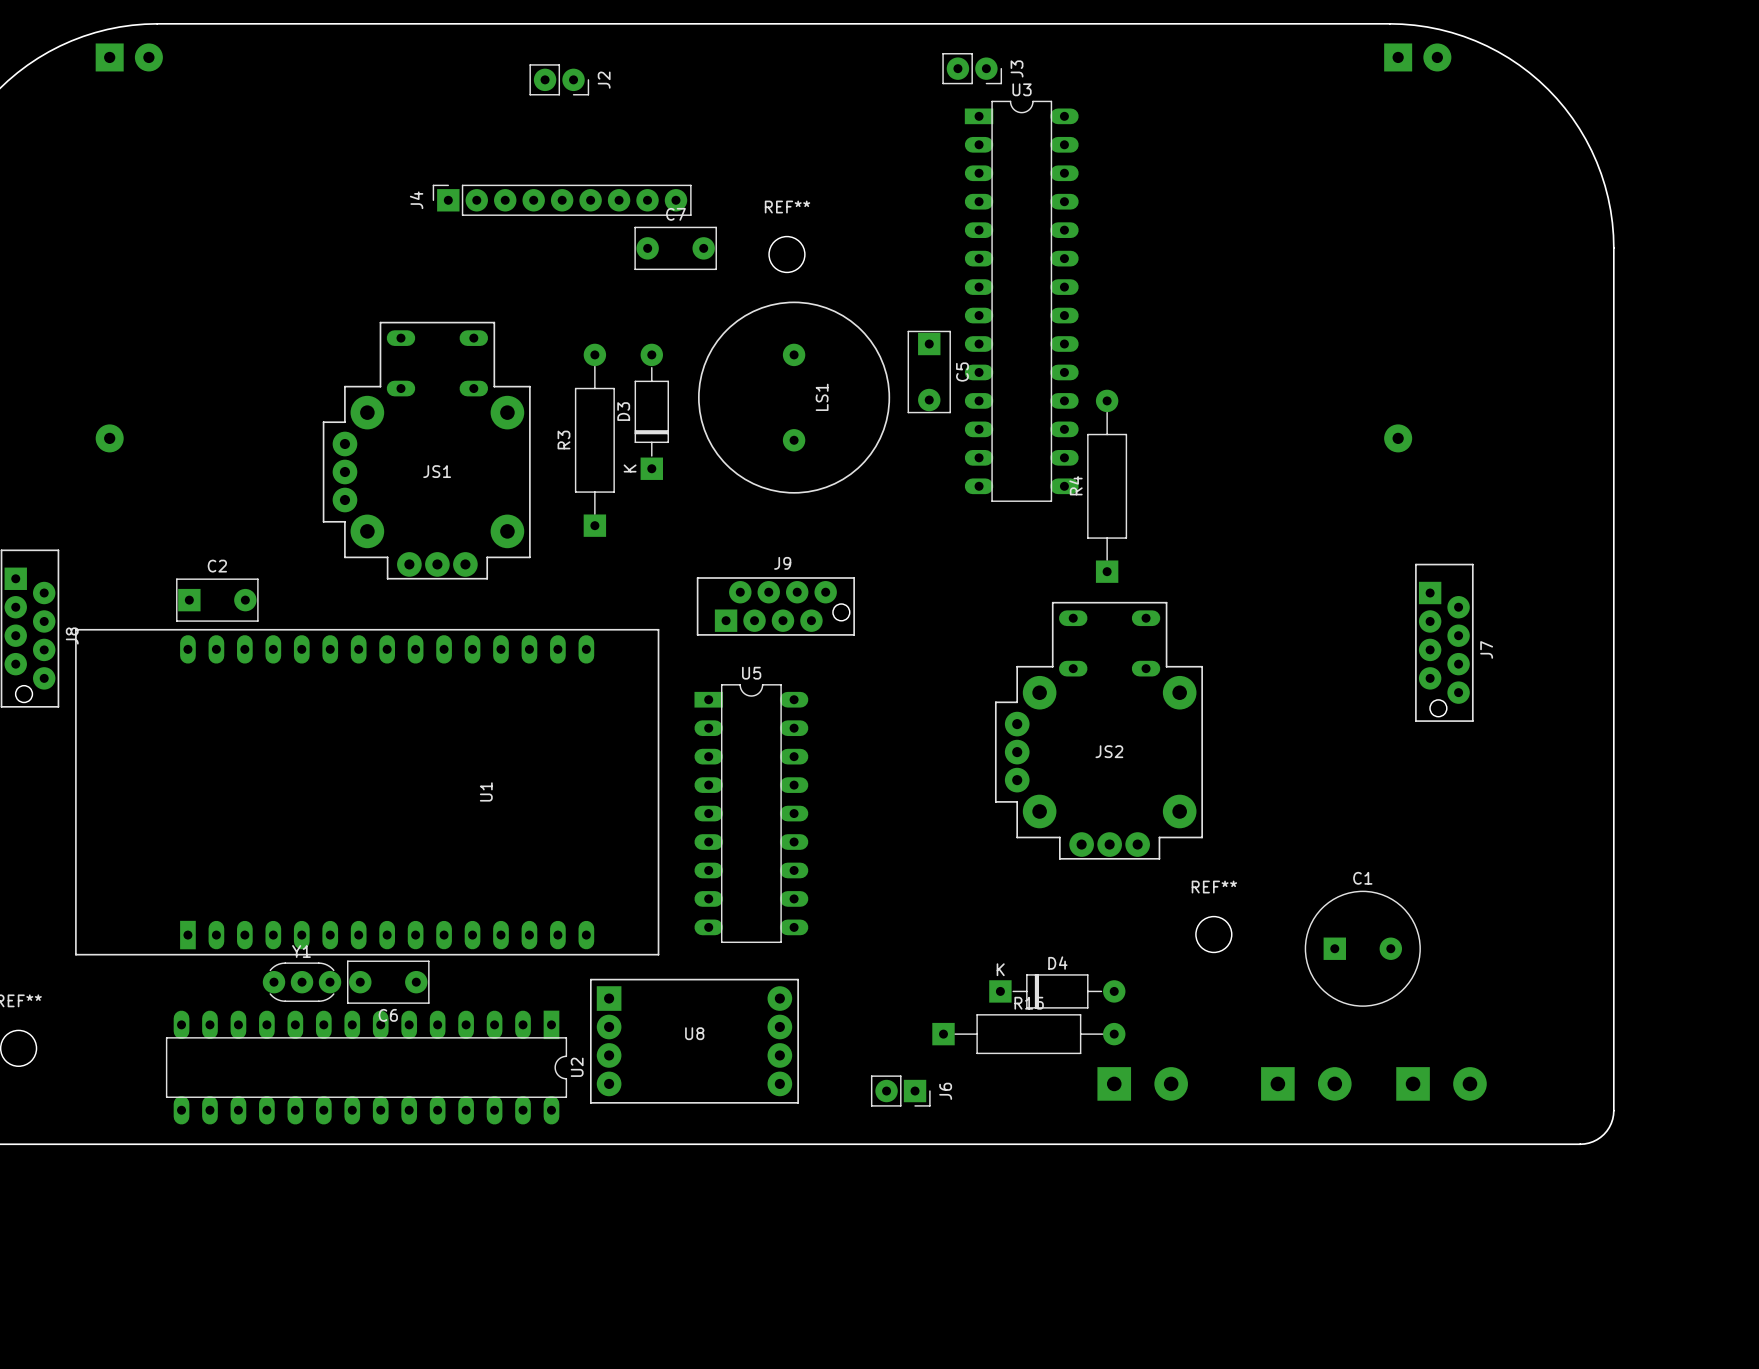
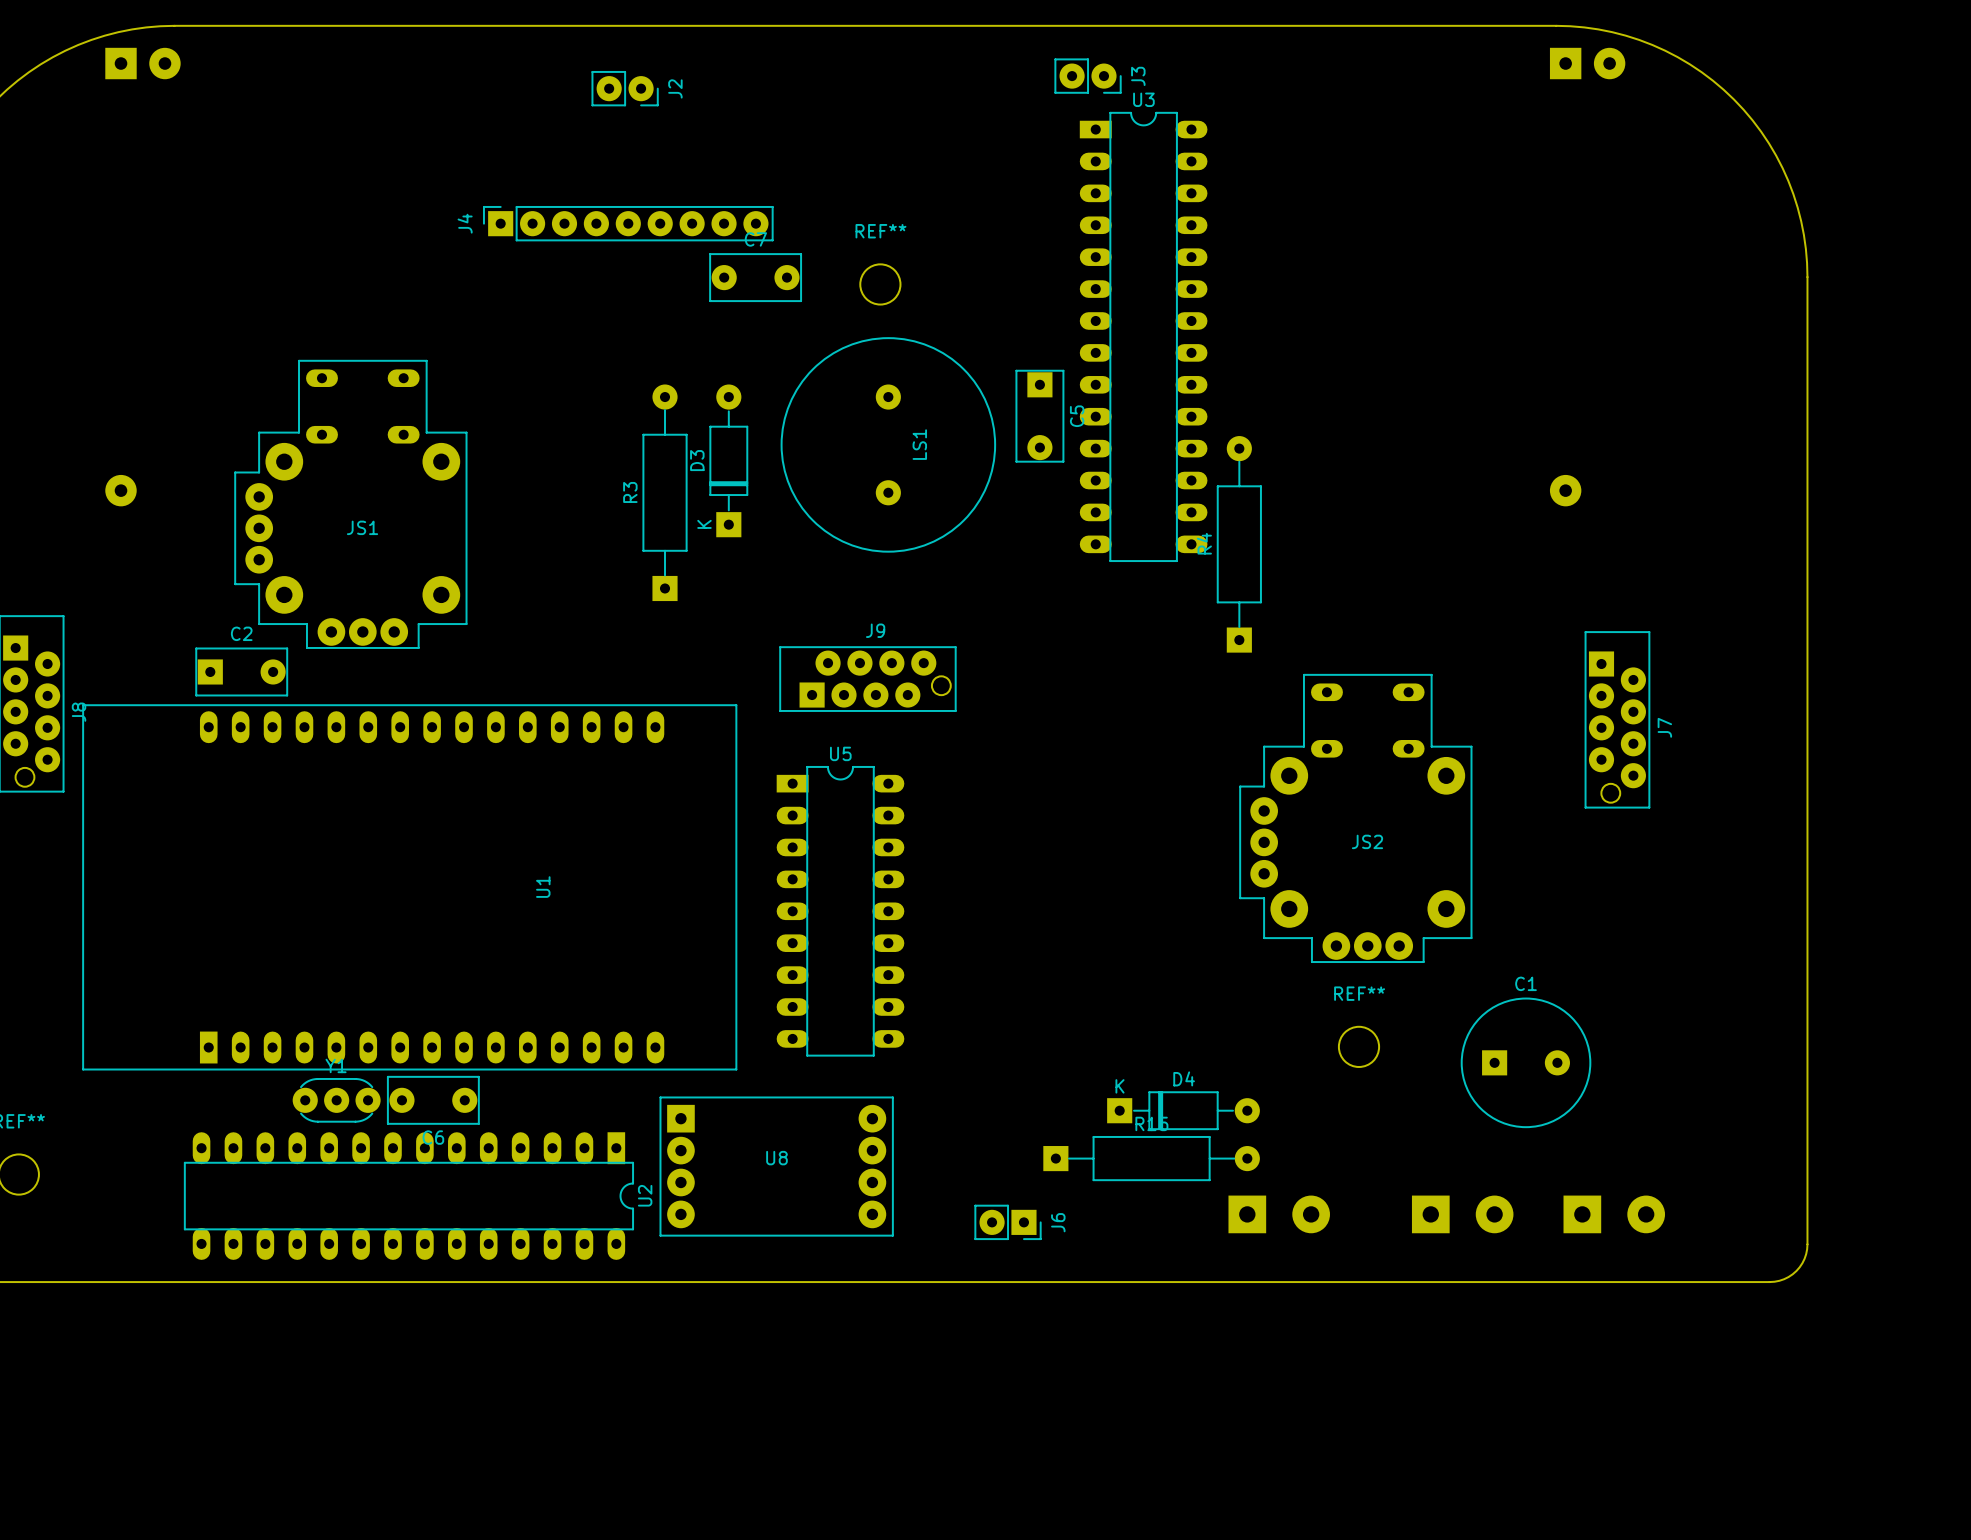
JS1 position: (426, 450) -> (350, 504)
JS2 position: (1098, 730) -> (1355, 818)

